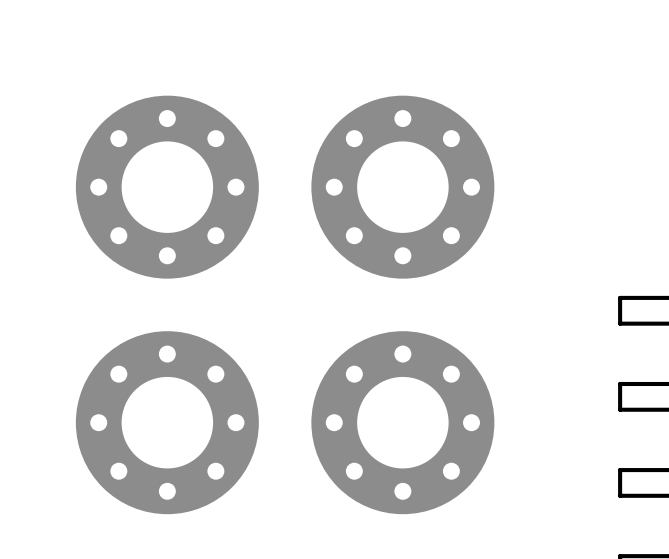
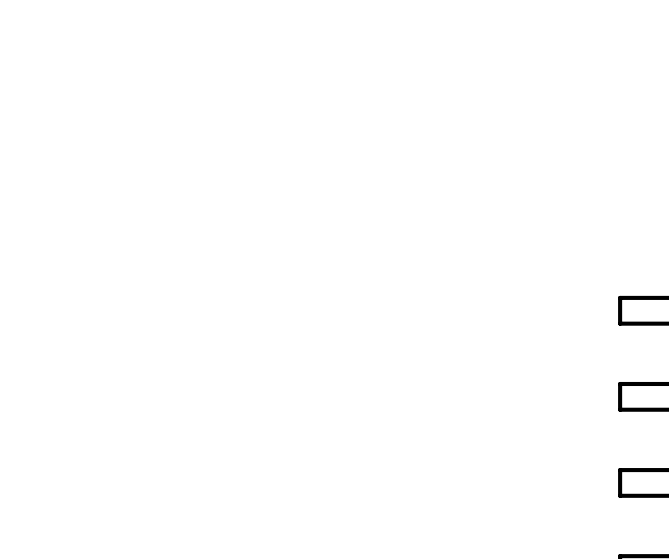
part: (167, 187) -> none
part: (402, 187) -> none
part: (167, 422) -> none
part: (402, 422) -> none

